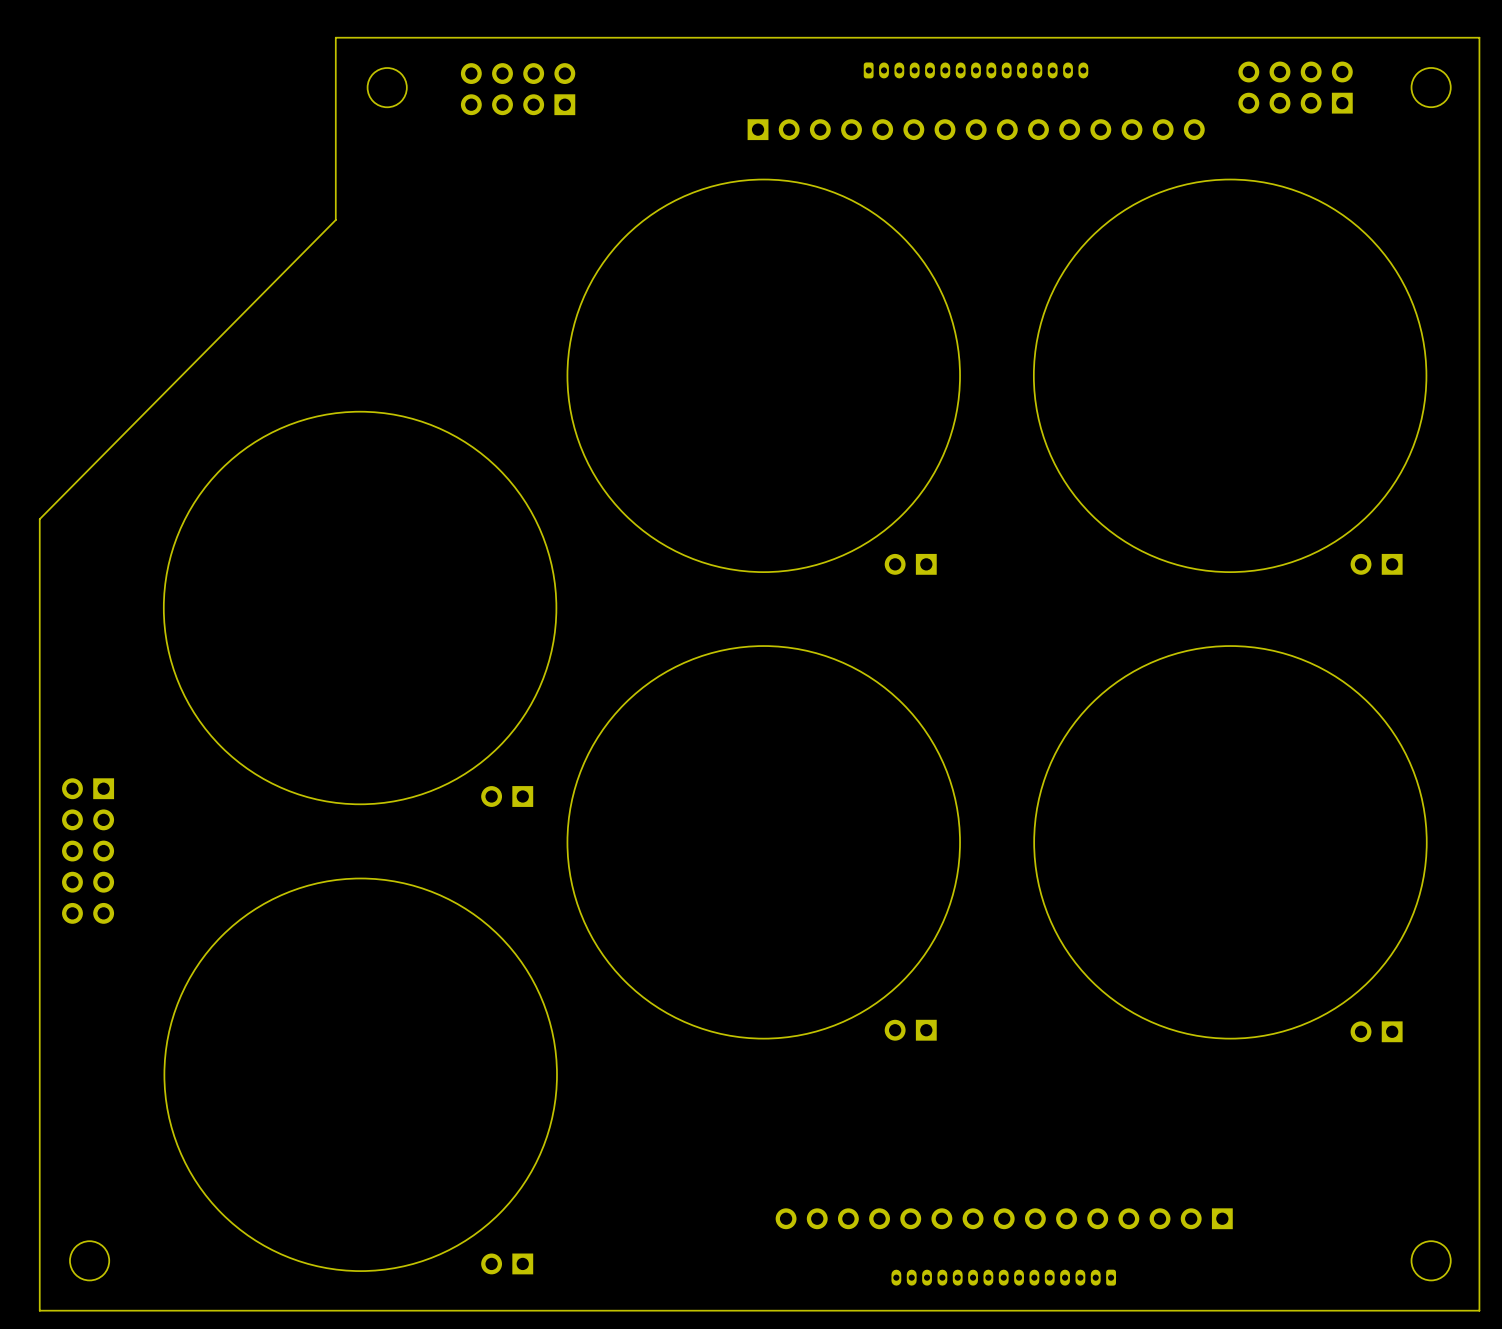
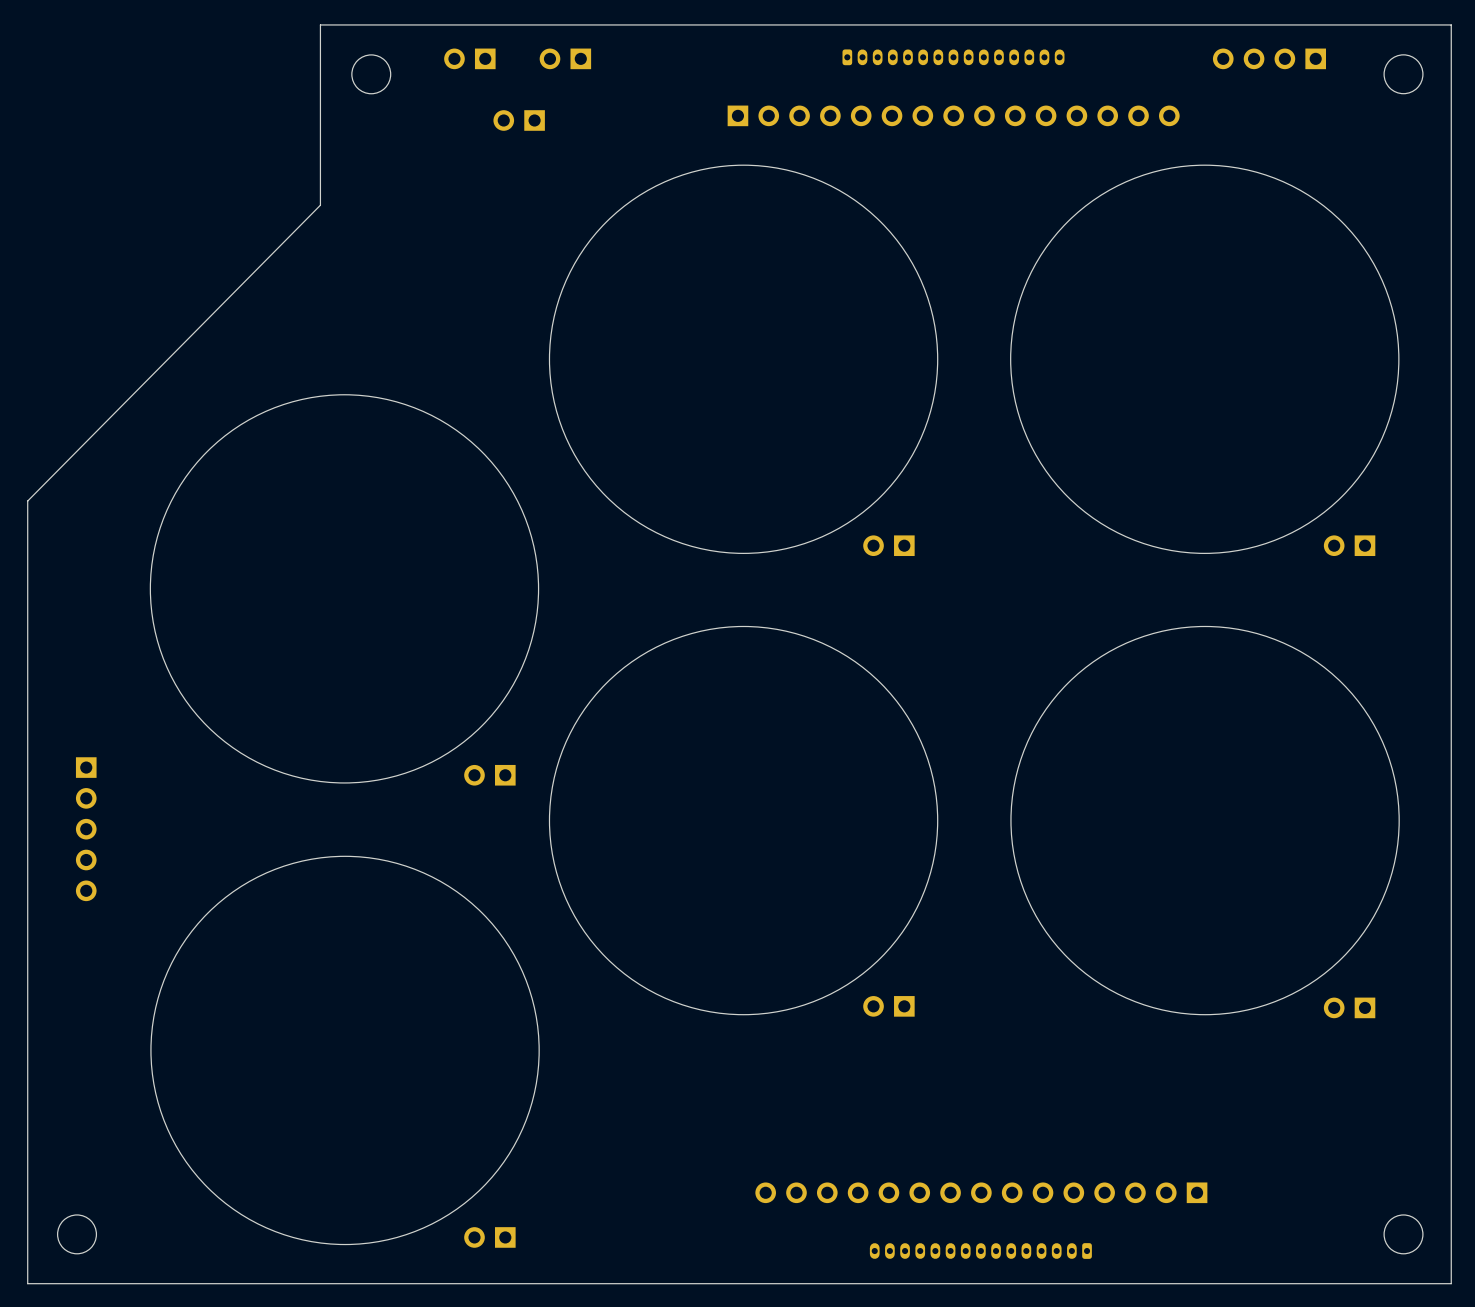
part: none -> (469, 58)
part: none -> (565, 58)
part: none -> (1269, 58)
part: (1295, 87) -> none
part: (518, 89) -> none
part: none -> (519, 120)
part footprint: [62, 778, 115, 924] -> [75, 757, 97, 902]

